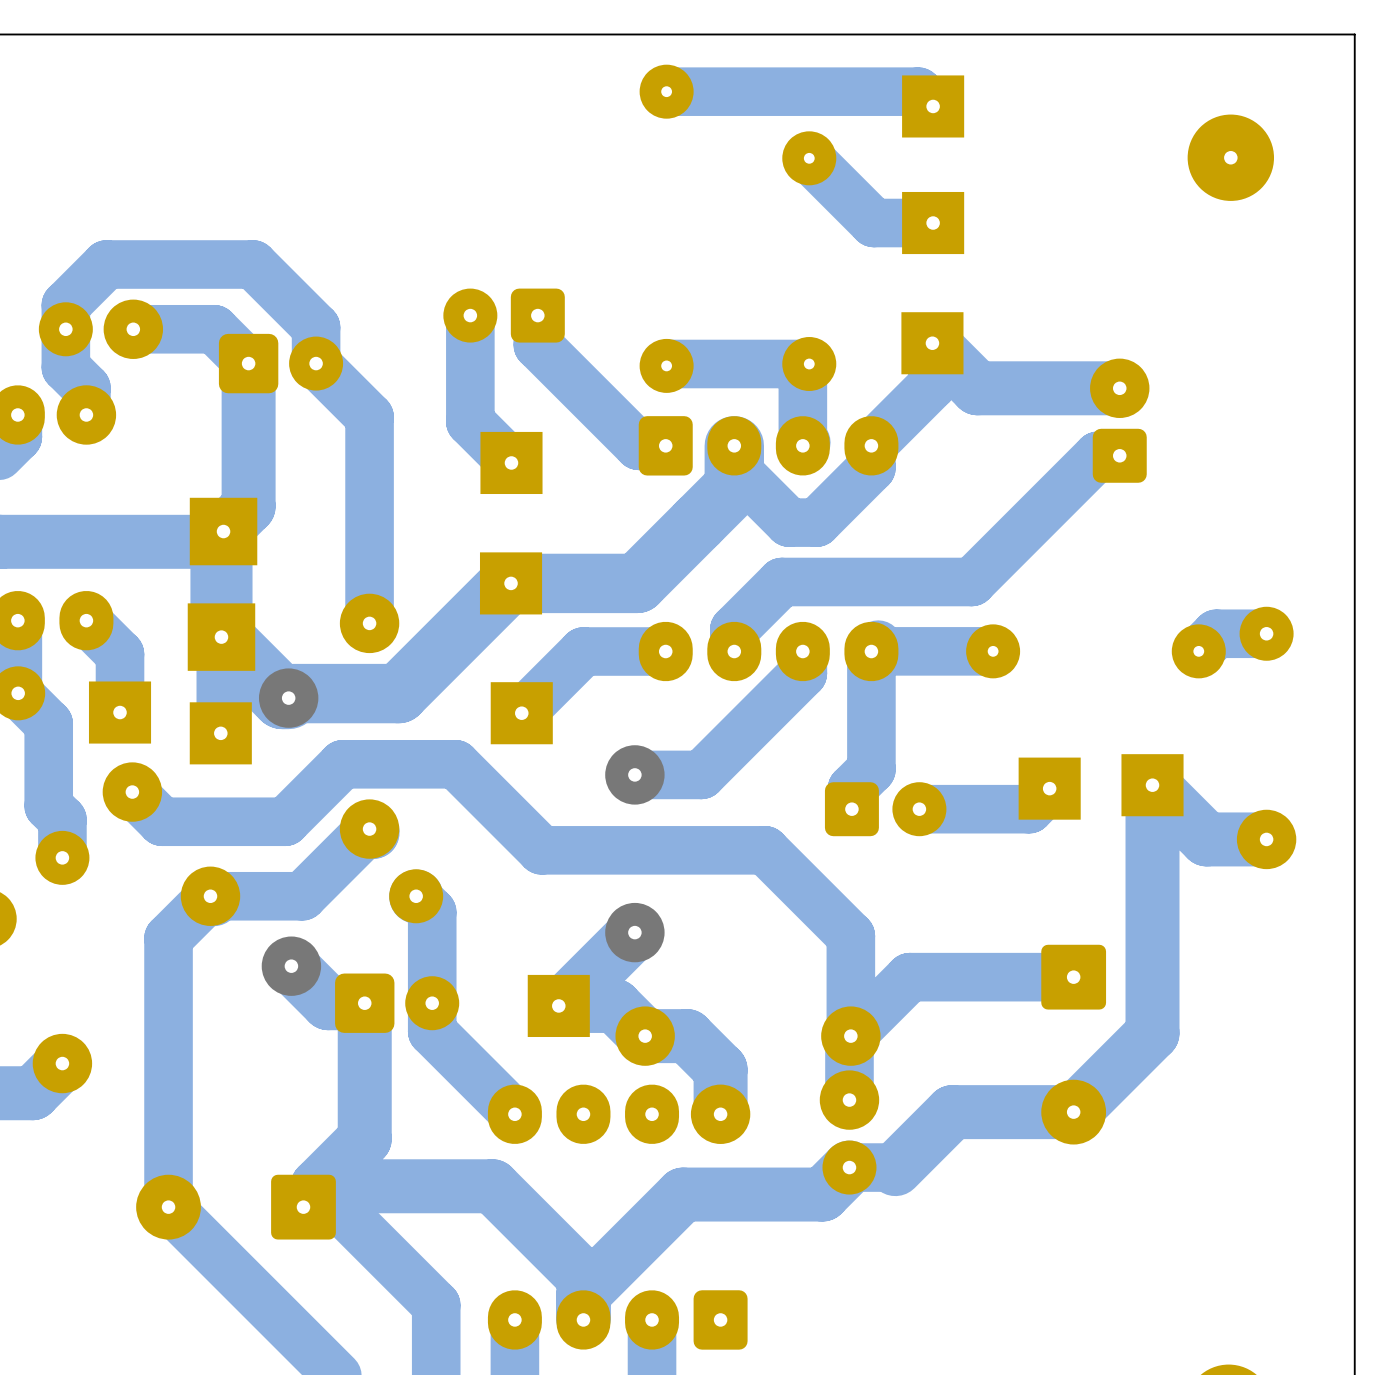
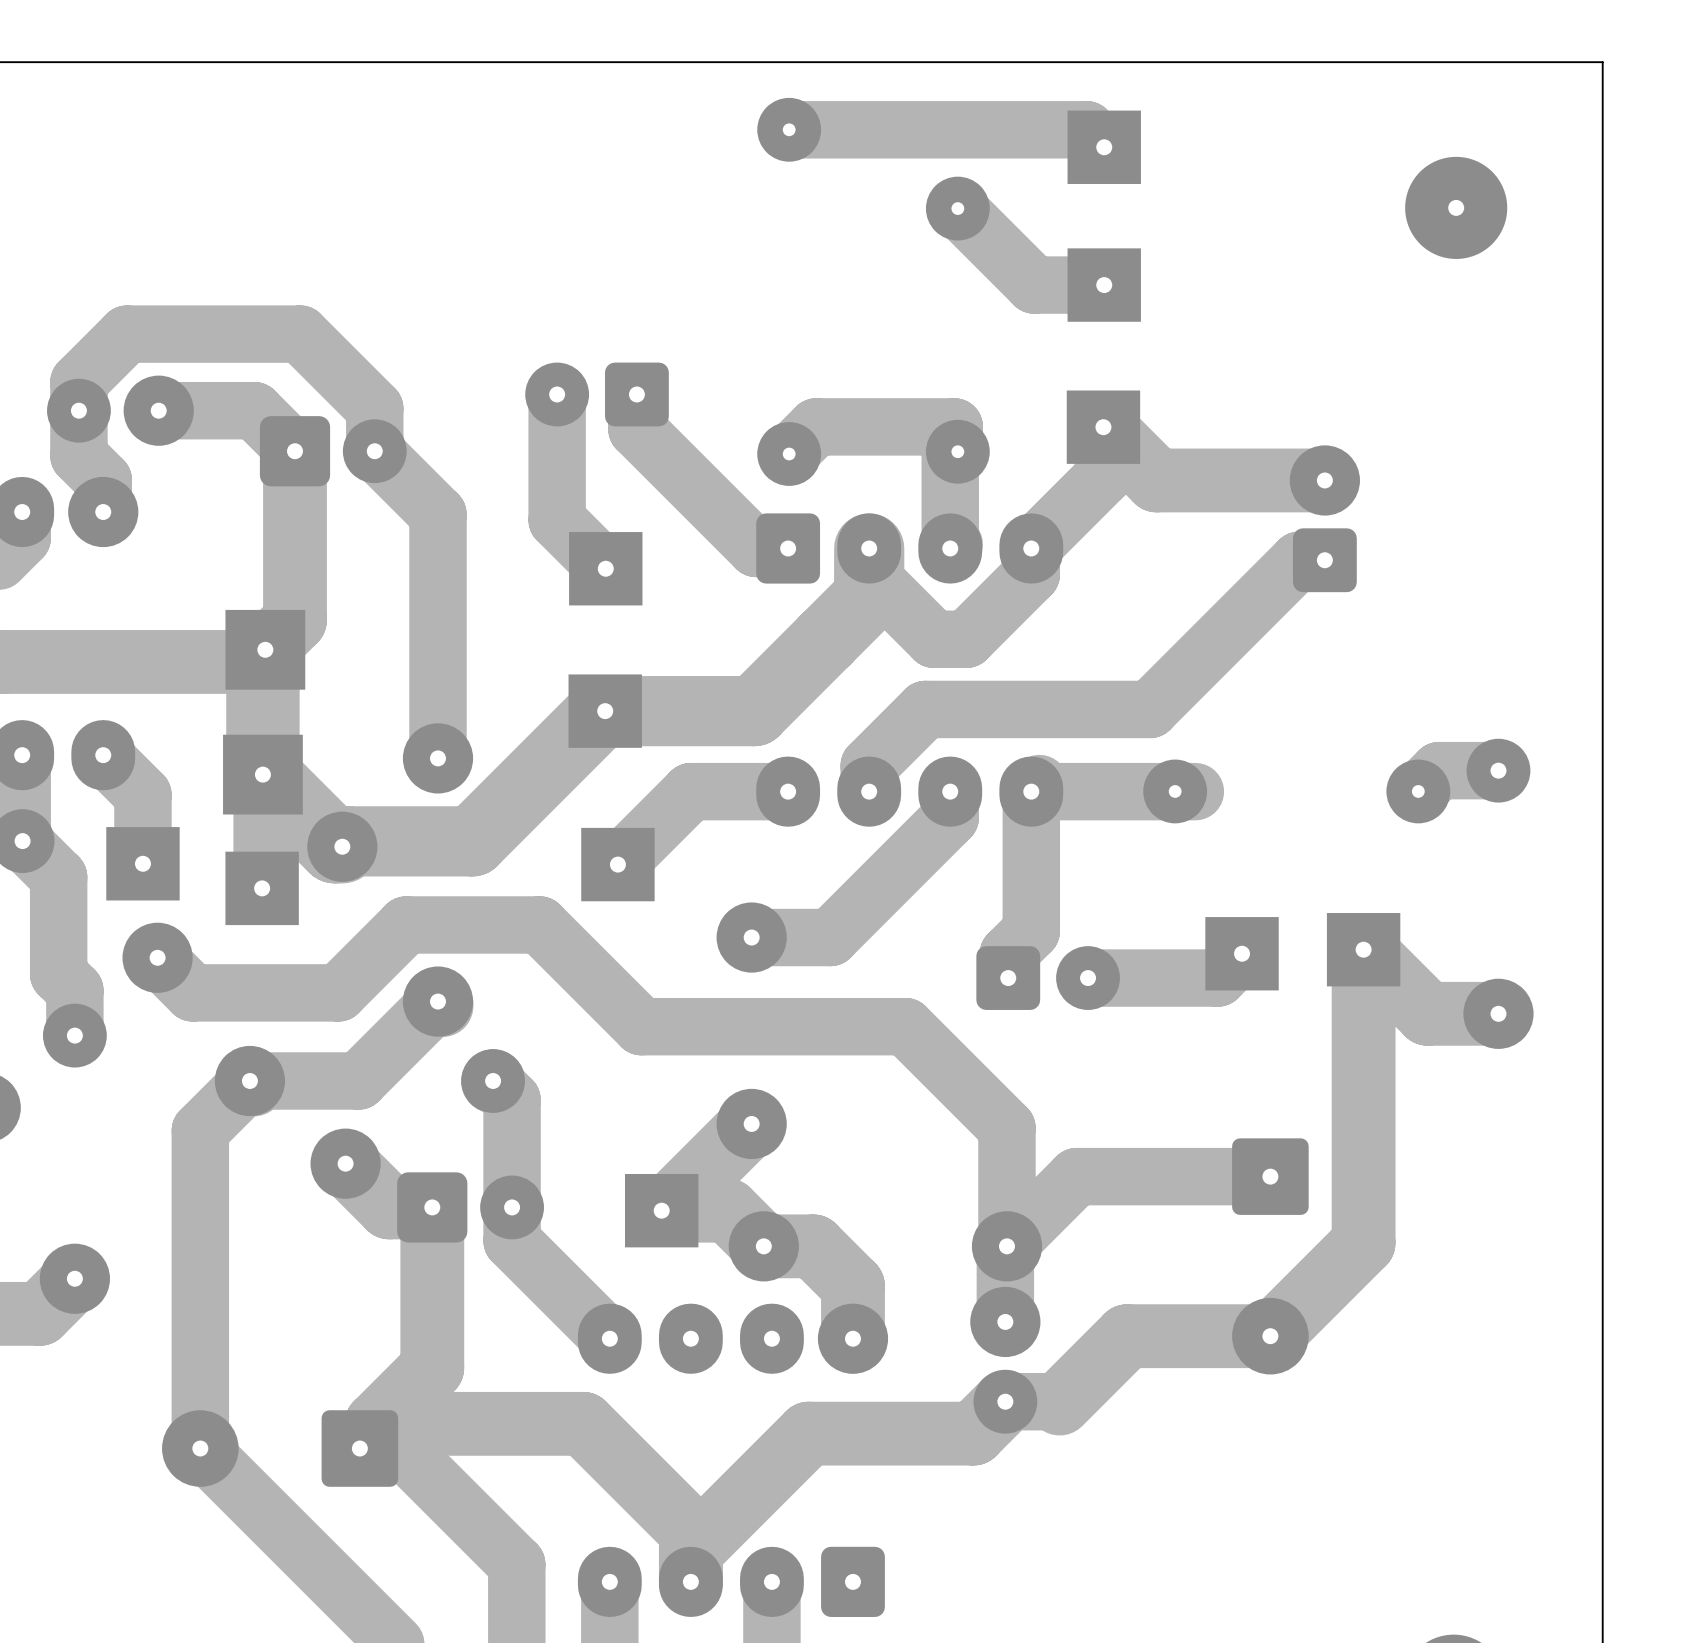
track: (668, 363) (809, 363) (802, 370) -> (791, 451) (816, 426) (954, 426) (950, 430) (950, 459)
track: (993, 651) (871, 651) -> (1195, 791) (1031, 791)

